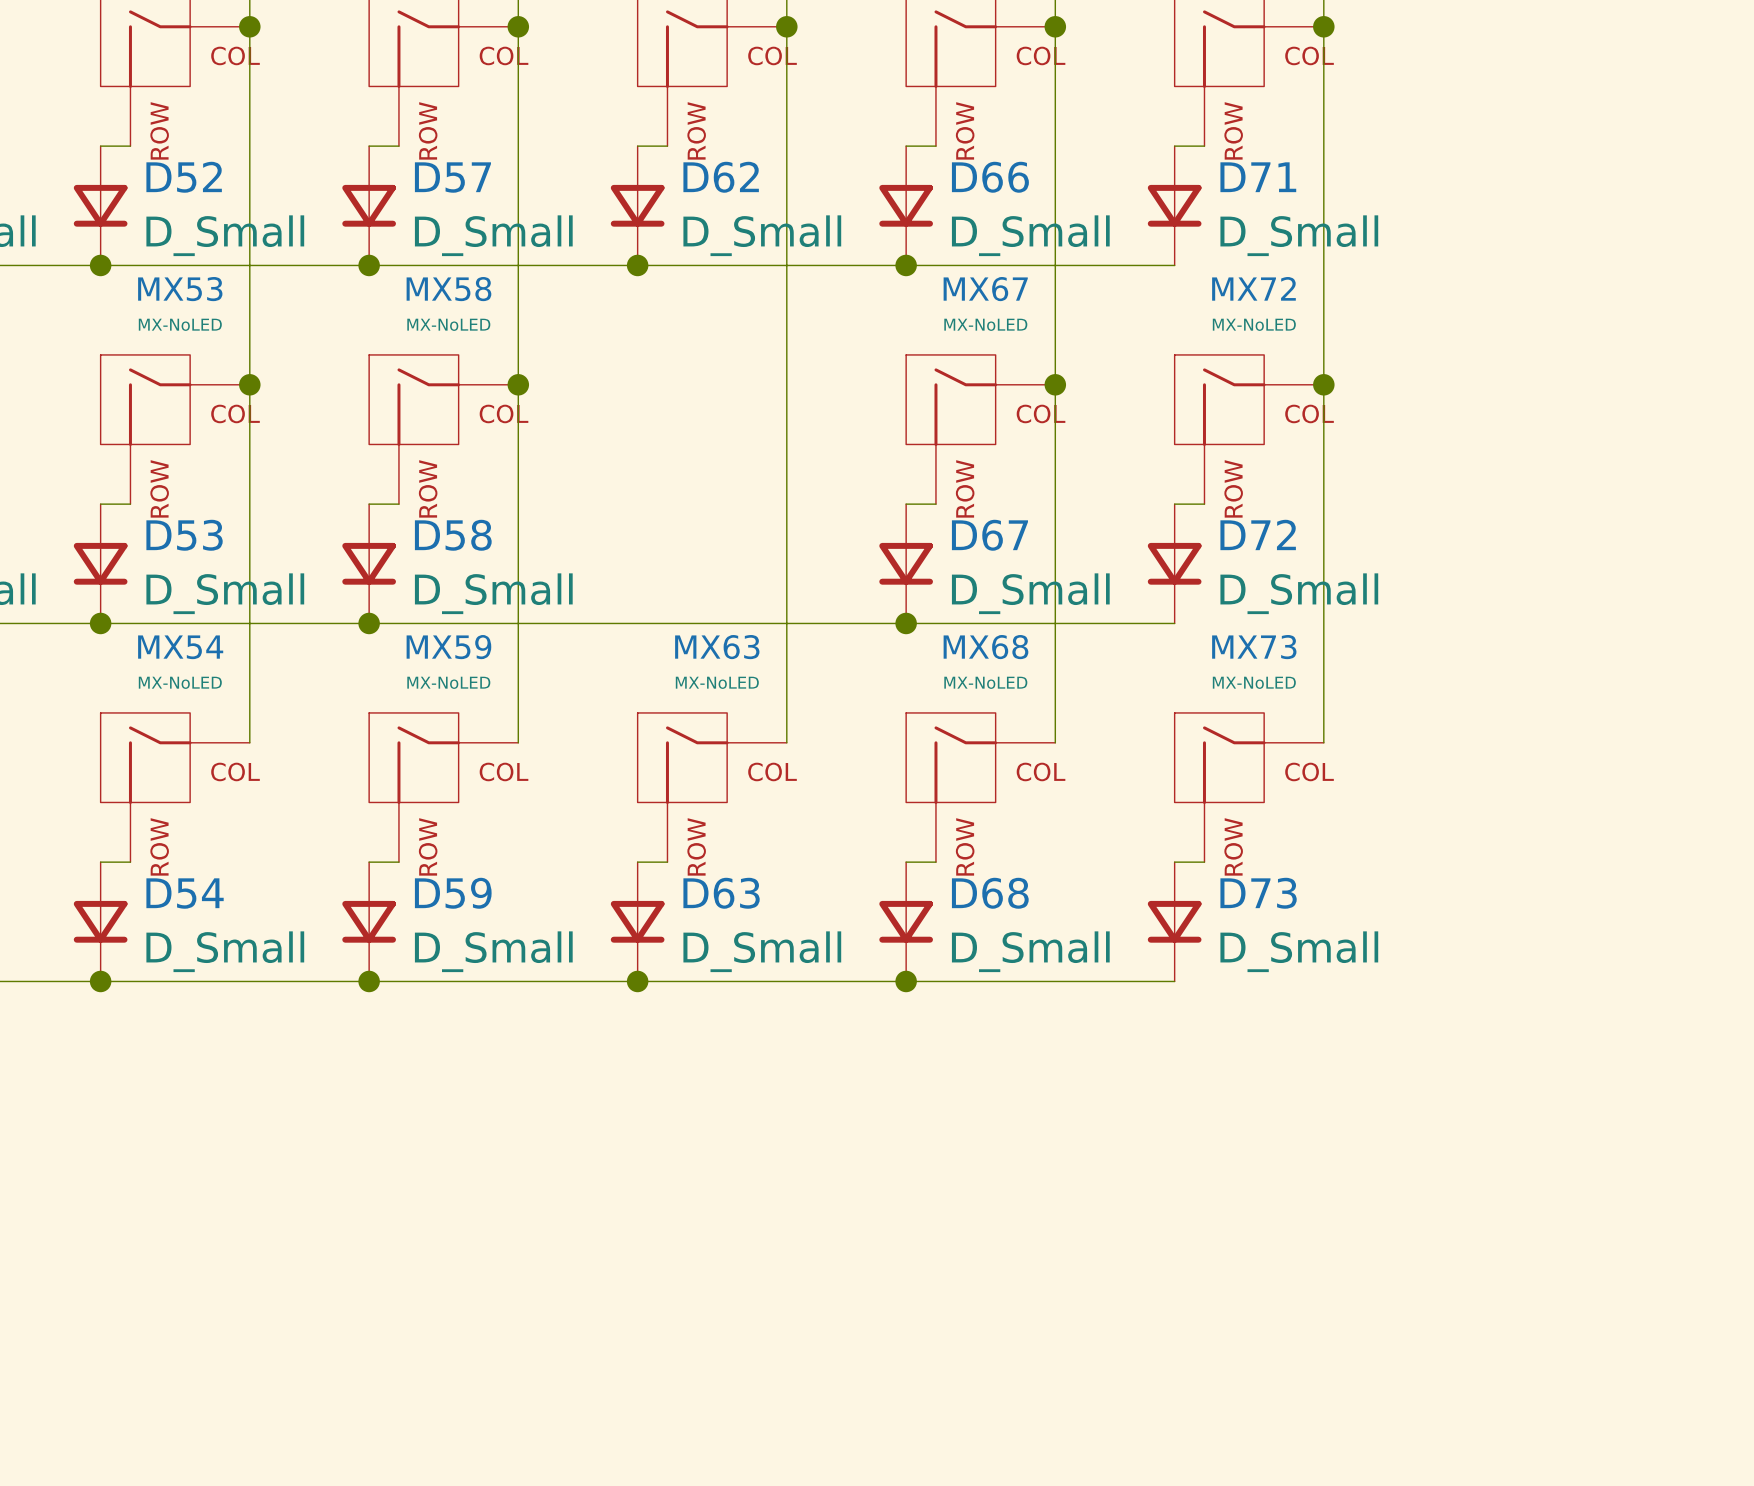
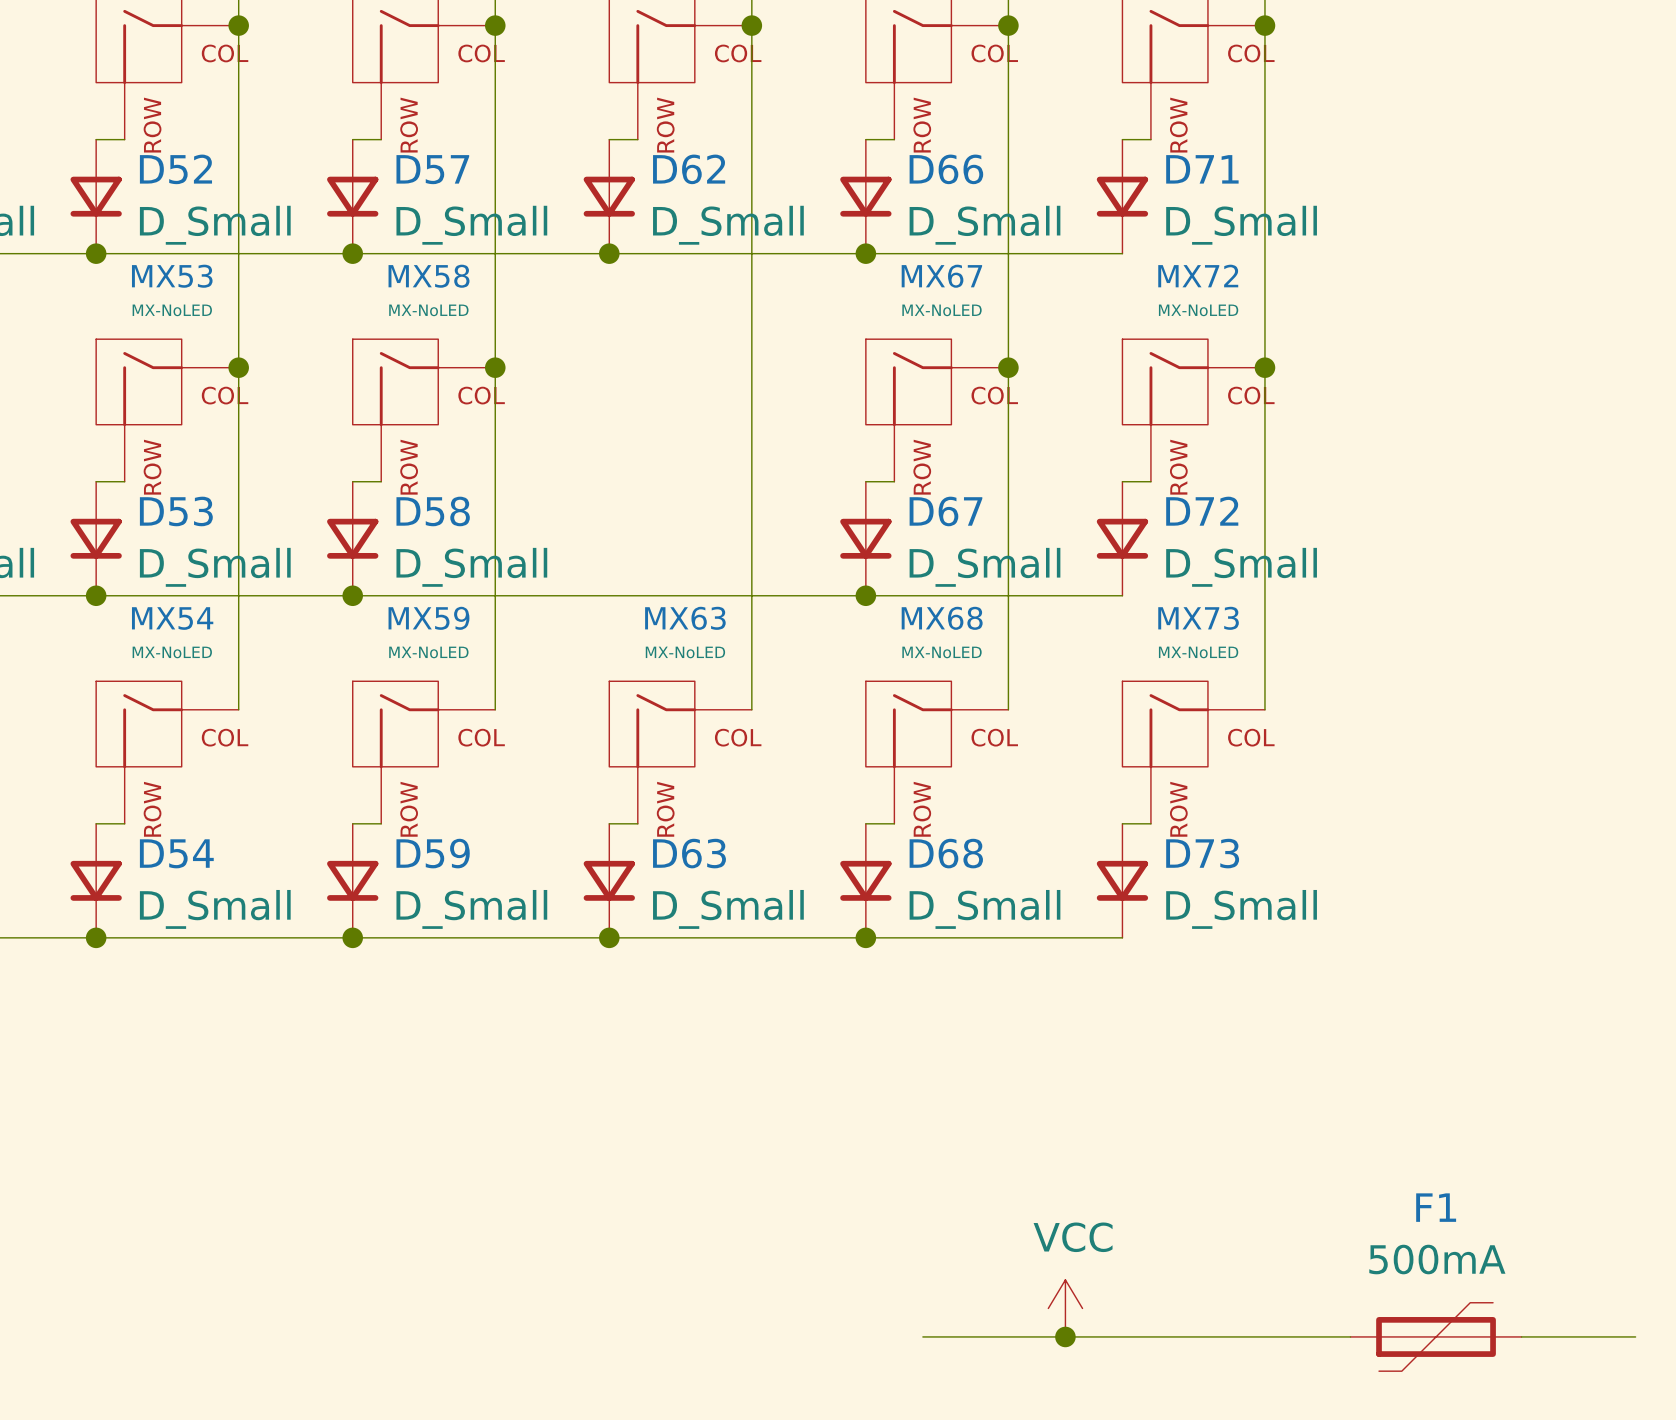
power symbol: none -> VCC (1065, 1308)
wire: none -> (922, 1336) (1350, 1336)
junction: none -> (1065, 1336)
F1: none -> 500mA (1436, 1336)
wire: none -> (1521, 1336) (1635, 1336)

